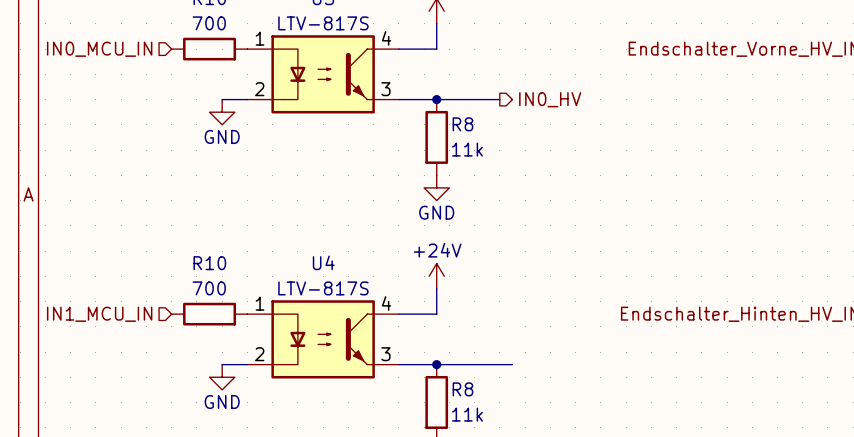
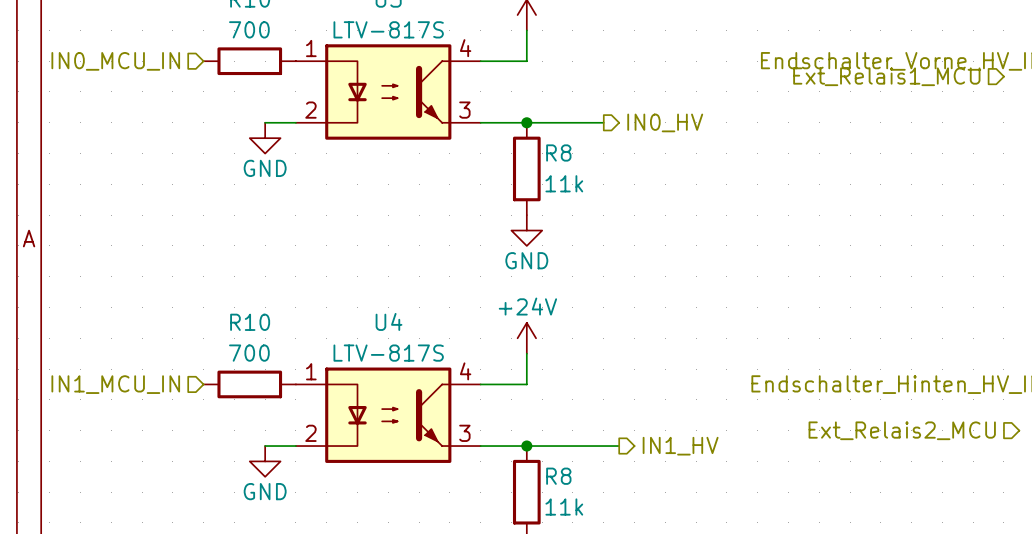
hierarchical label: none -> Ext_Relais1_MCU (886, 76)
hierarchical label: none -> Ext_Relais2_MCU (902, 430)
hierarchical label: none -> IN1_HV (680, 446)

